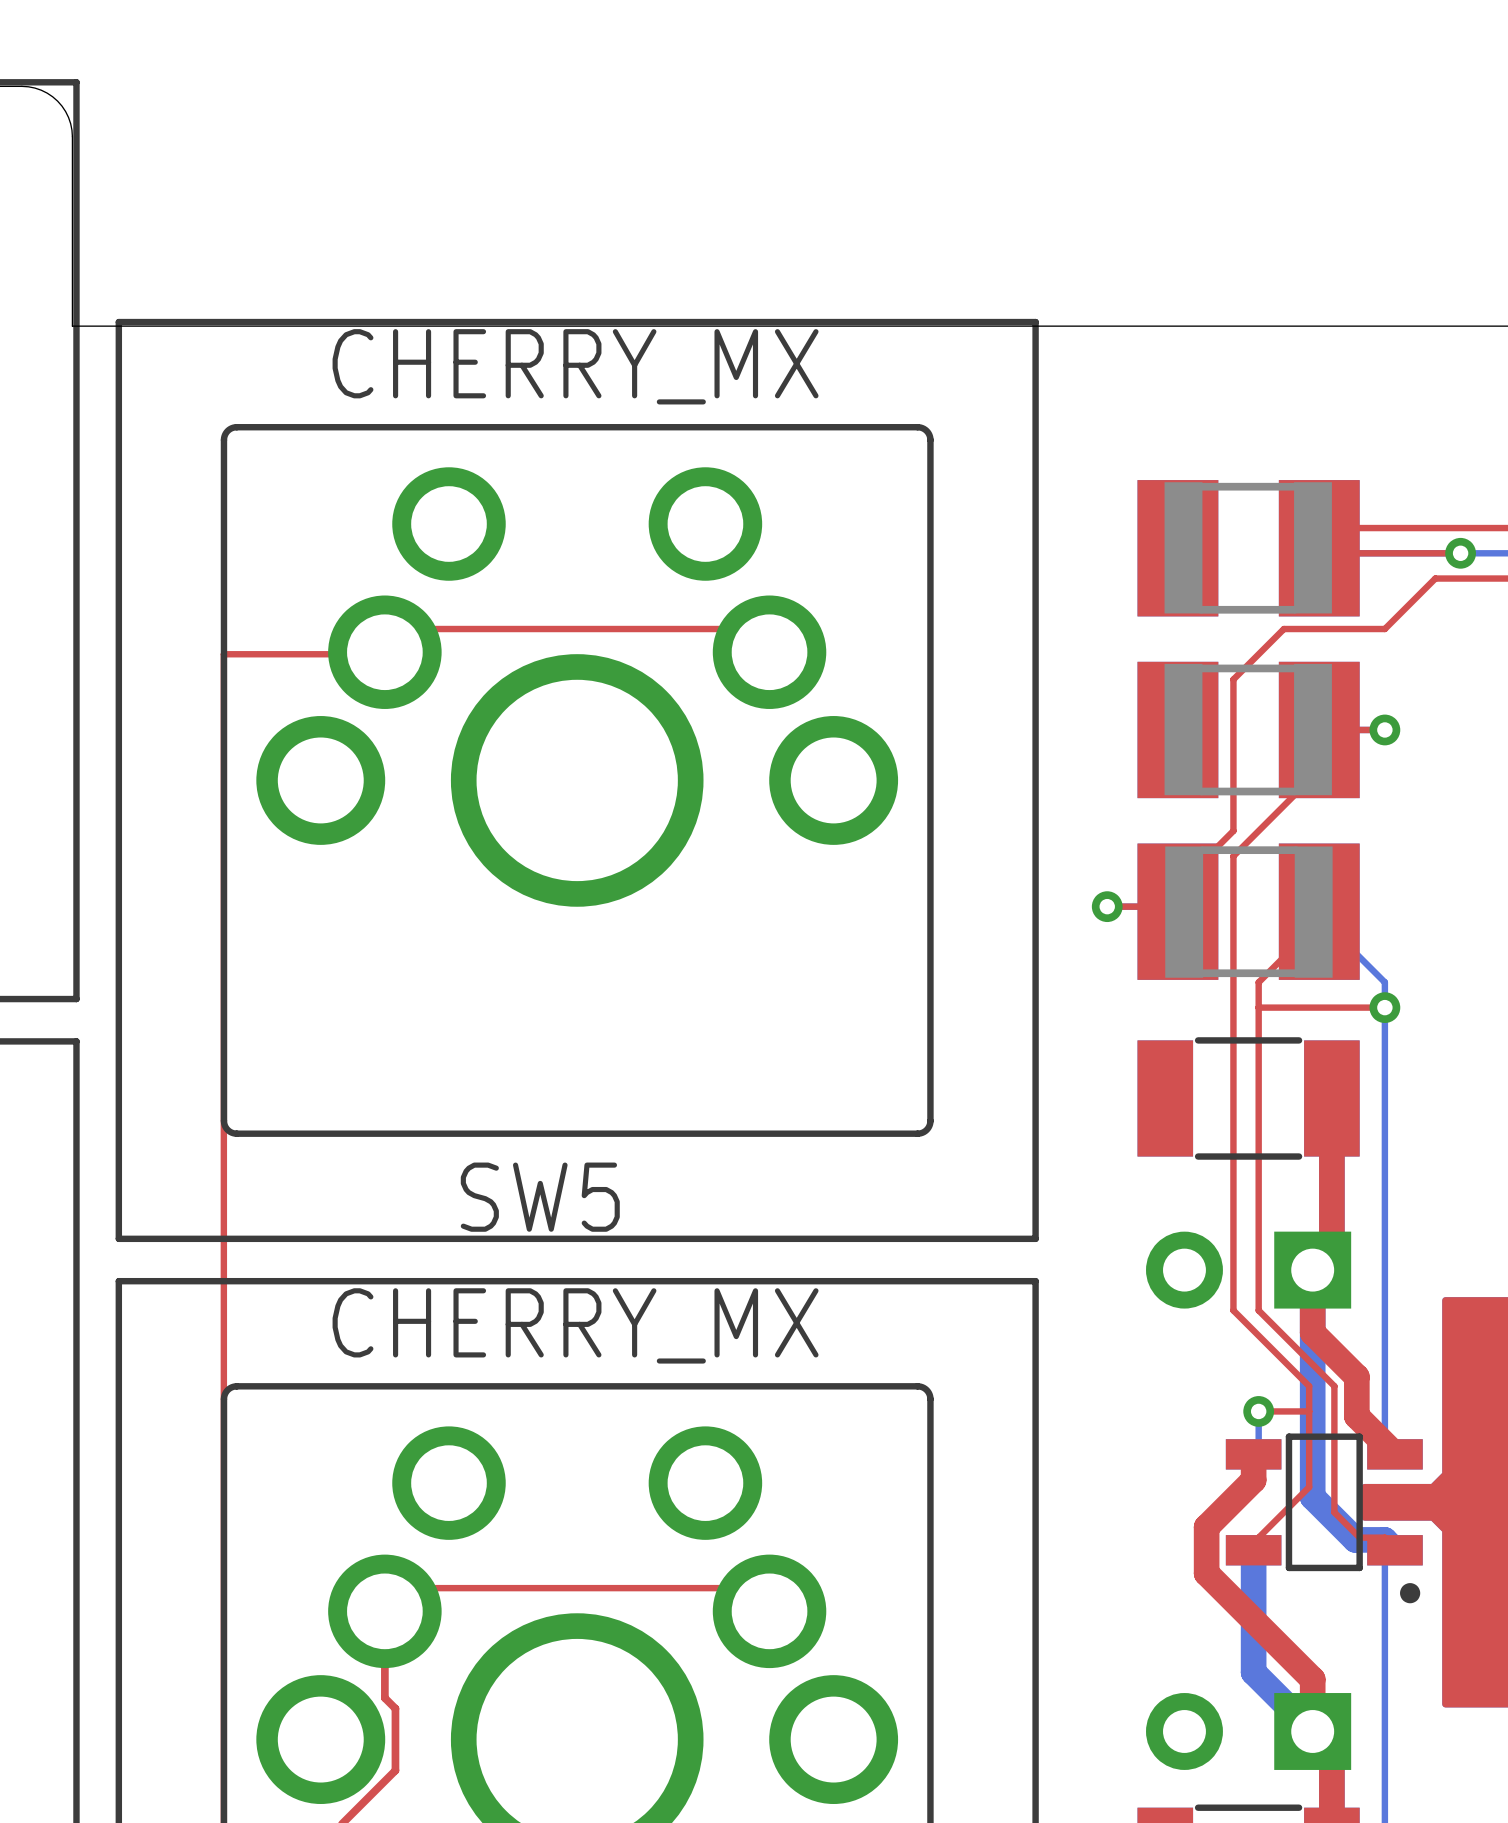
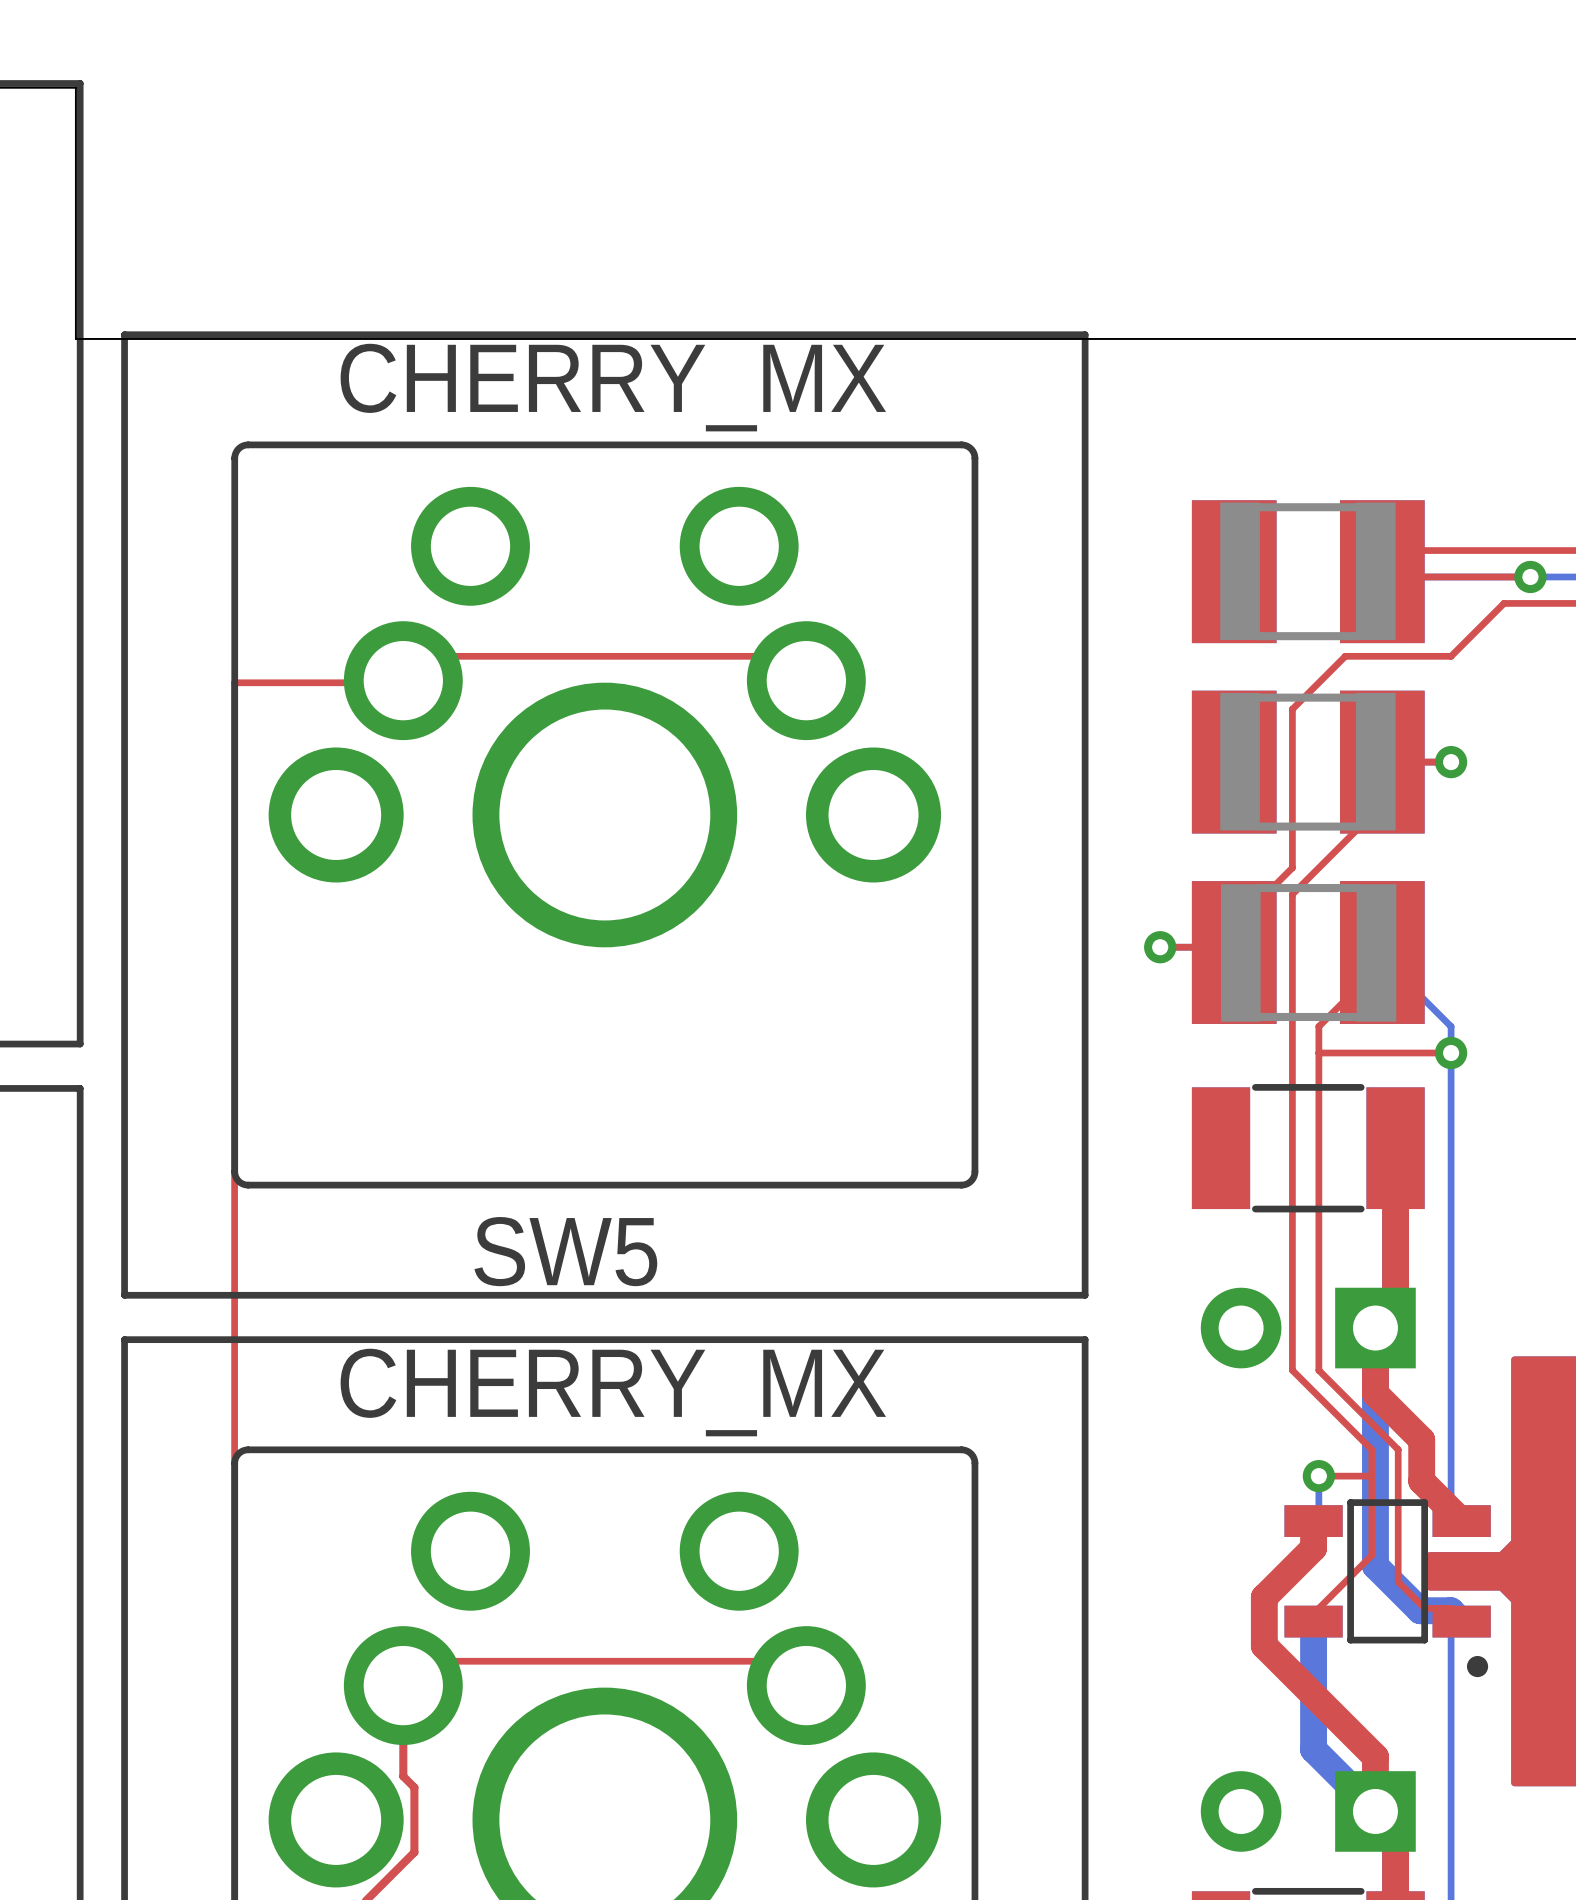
board edge: (21, 86) (41, 90) (57, 101) (68, 117) (72, 136) -> (23, 87) (75, 87) (75, 140)

